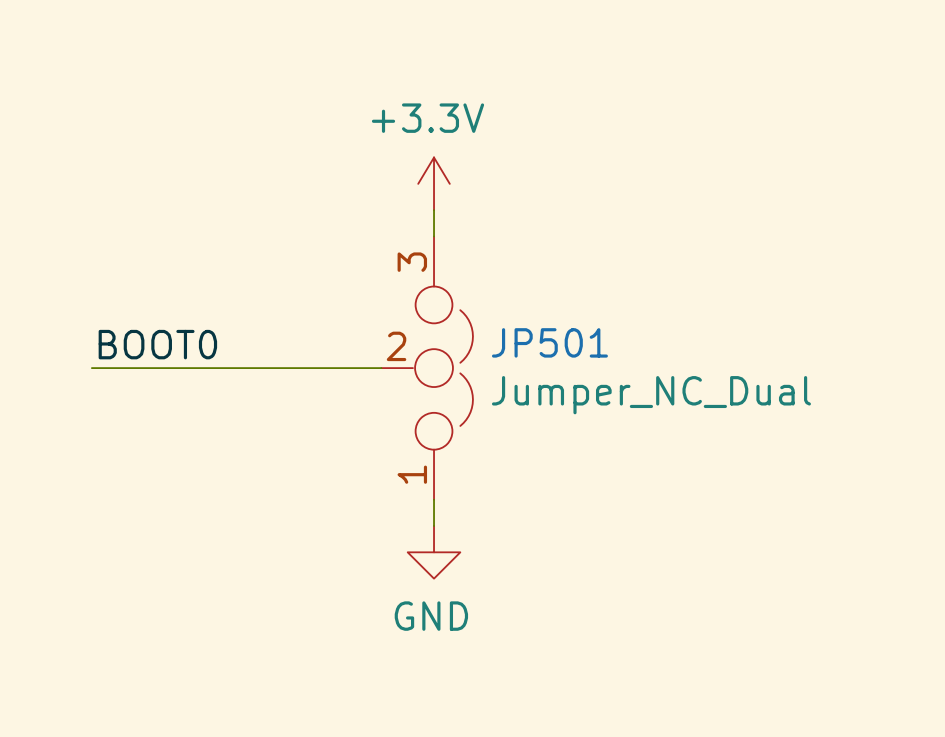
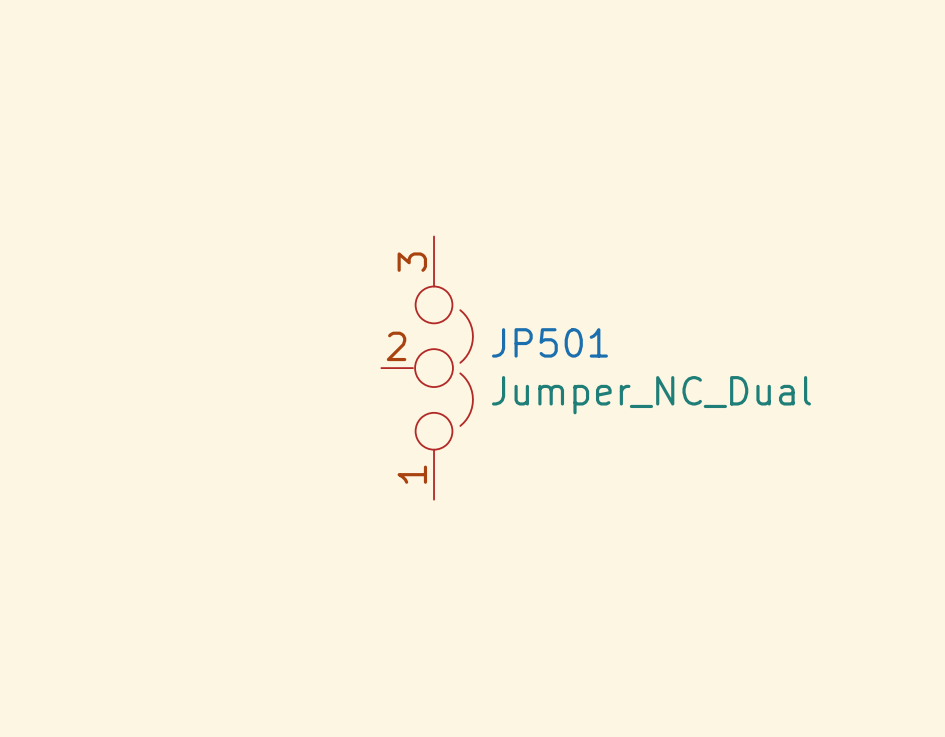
power symbol: +3.3V (434, 183) -> none
wire: (434, 210) (434, 236) -> none
label: BOOT0 (157, 344) -> none
wire: (91, 368) (381, 368) -> none
wire: (434, 499) (434, 526) -> none
power symbol: GND (434, 552) -> none

